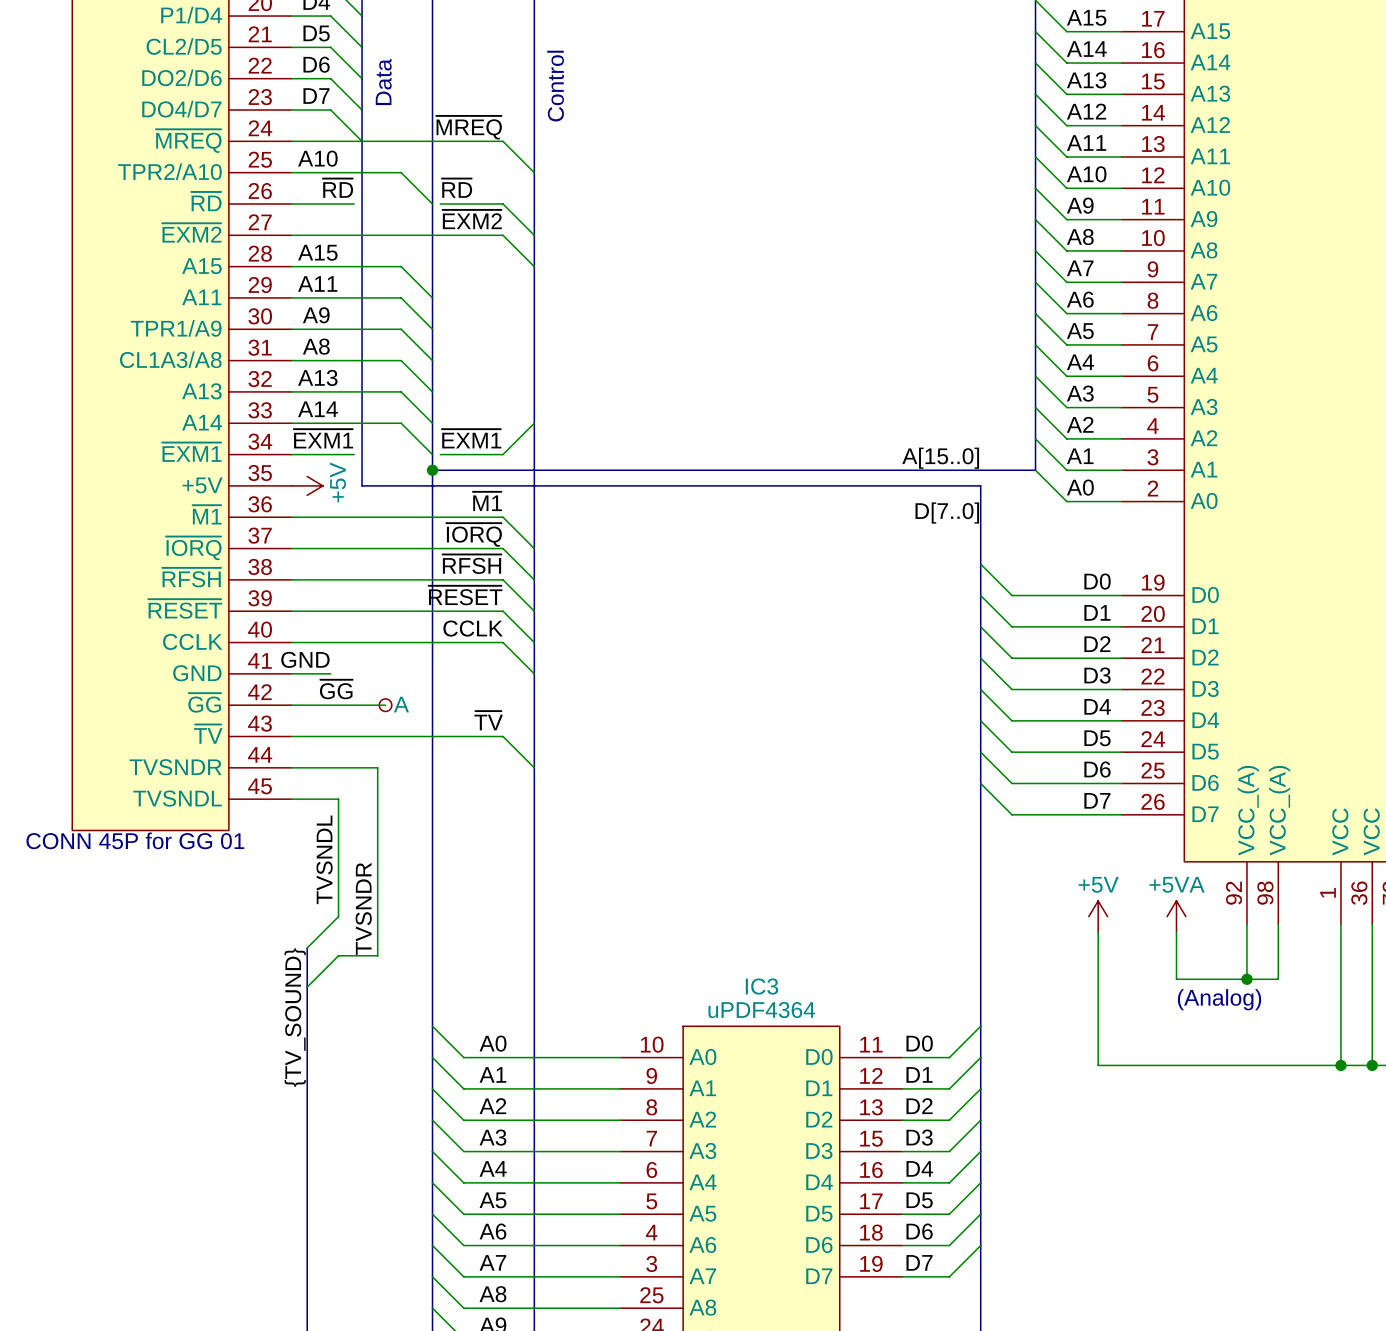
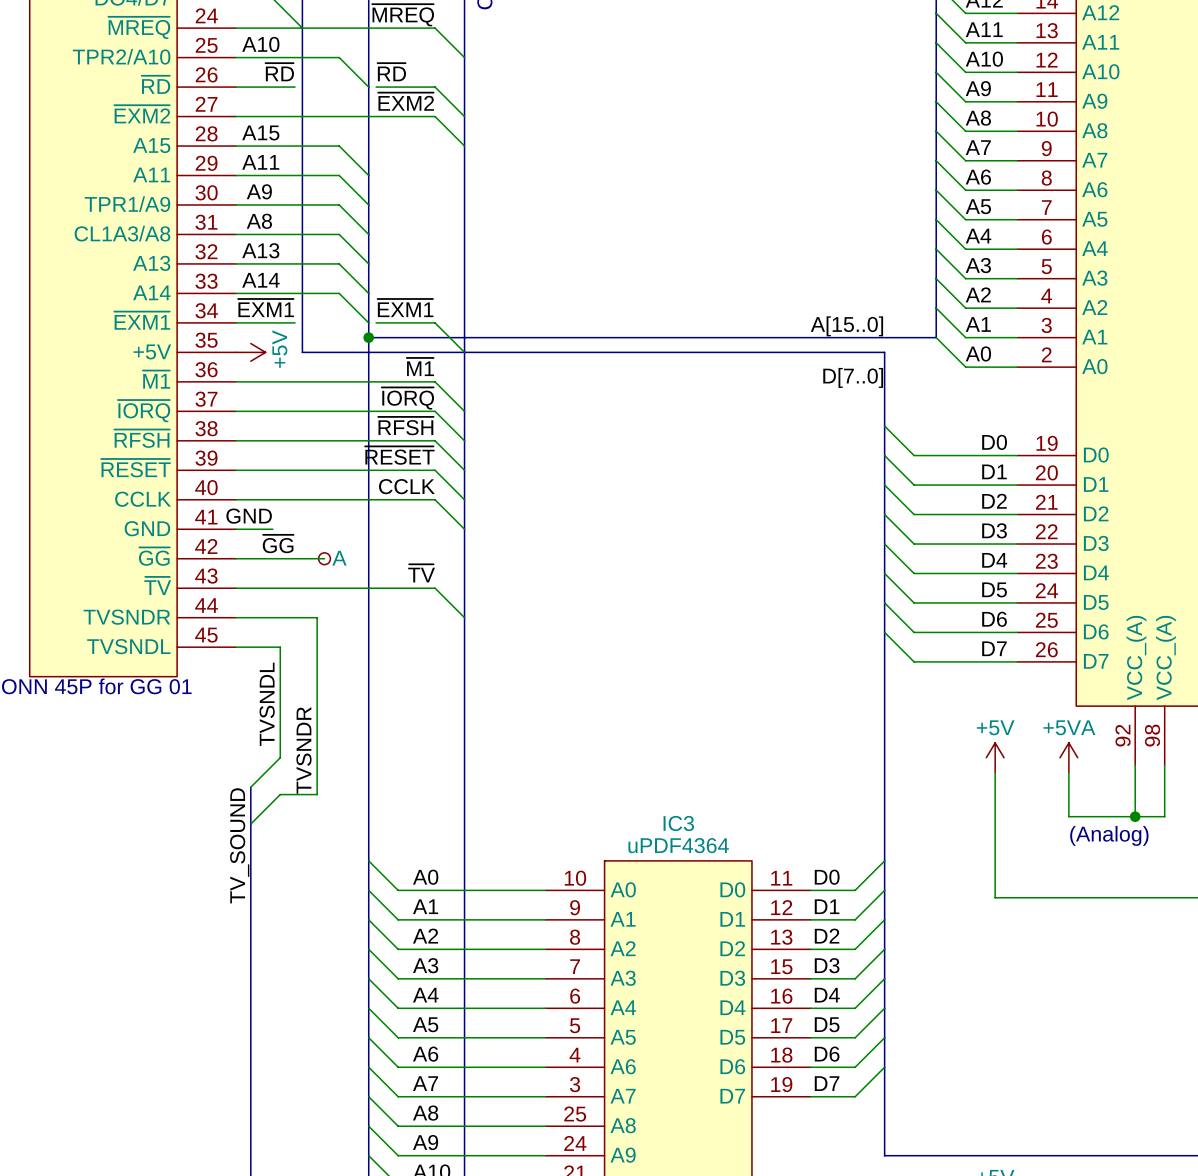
wire: (534, 423) (502, 454) -> (464, 352) (435, 322)
label: {TV_SOUND} (295, 1017) -> TV_SOUND (239, 845)

